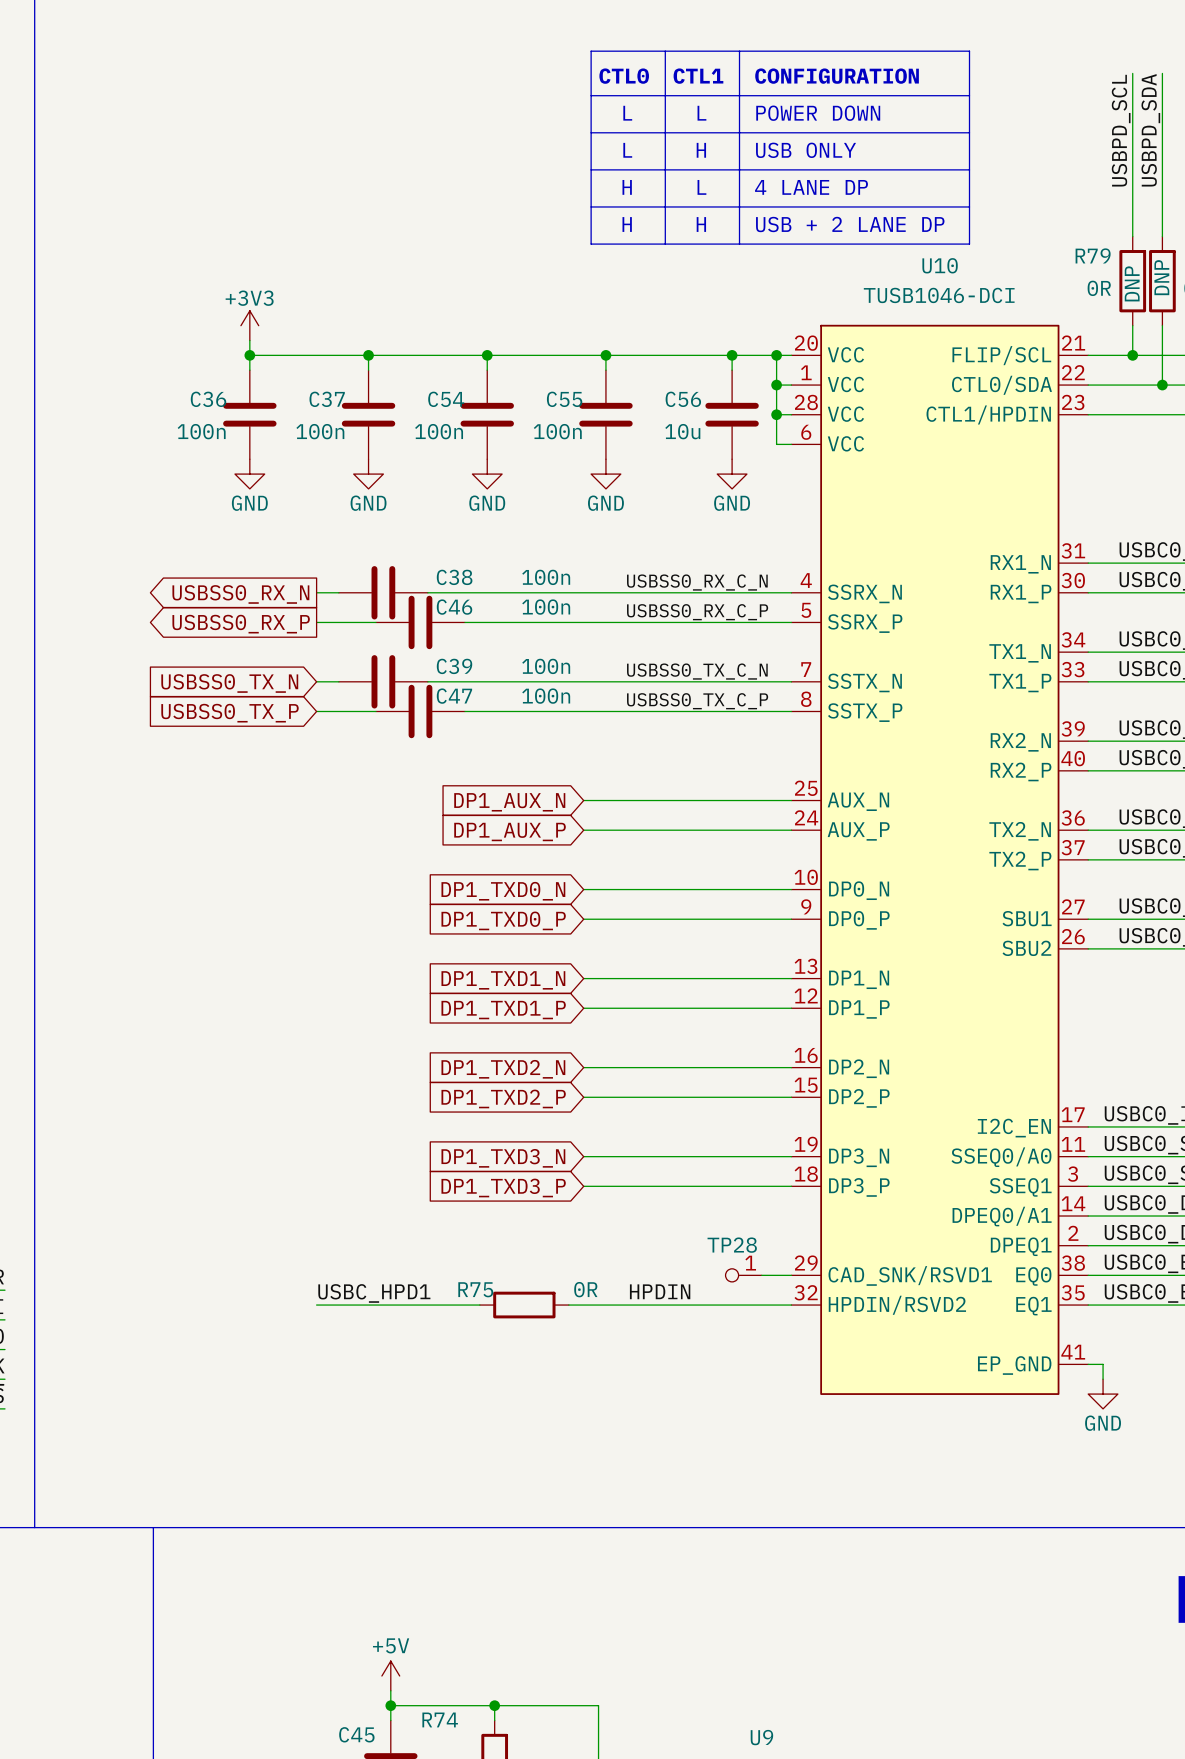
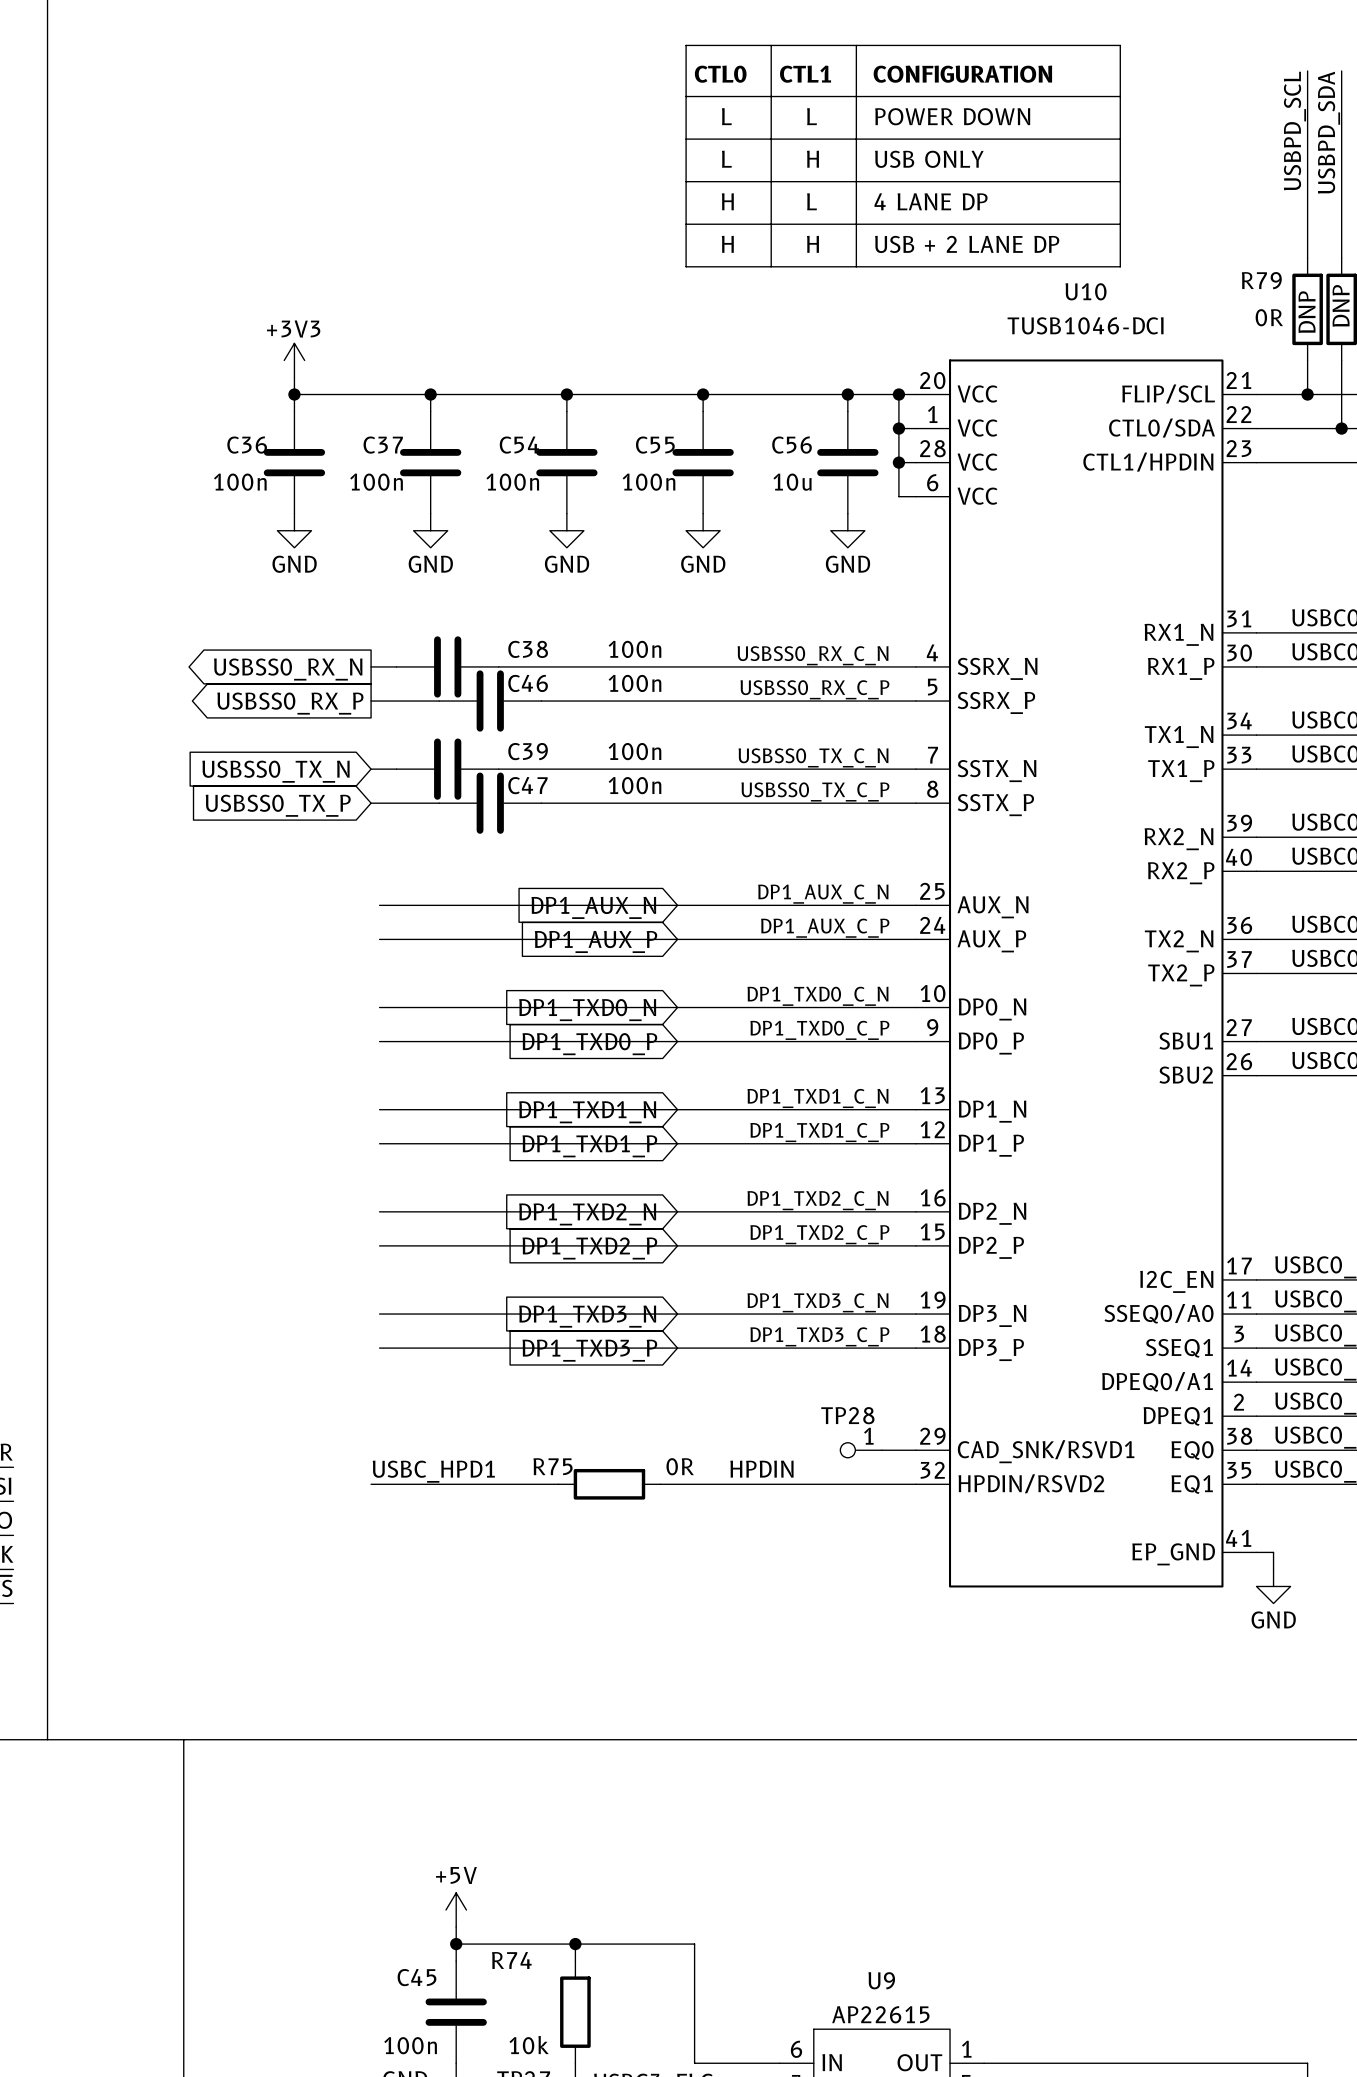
label: none -> DP1_AUX_C_N (823, 894)
wire: none -> (379, 905) (677, 905)
label: none -> DP1_AUX_C_P (825, 928)
wire: none -> (379, 939) (677, 939)
label: none -> DP1_TXD0_C_N (817, 996)
wire: none -> (379, 1007) (677, 1007)
label: none -> DP1_TXD0_C_P (819, 1030)
wire: none -> (379, 1041) (677, 1041)
label: none -> DP1_TXD1_C_N (817, 1098)
wire: none -> (379, 1109) (677, 1109)
label: none -> DP1_TXD1_C_P (819, 1132)
wire: none -> (379, 1143) (677, 1143)
label: none -> DP1_TXD2_C_N (817, 1200)
wire: none -> (379, 1211) (677, 1211)
label: none -> DP1_TXD2_C_P (819, 1234)
wire: none -> (379, 1245) (677, 1245)
label: none -> DP1_TXD3_C_N (817, 1302)
wire: none -> (379, 1314) (677, 1314)
label: none -> DP1_TXD3_C_P (819, 1336)
wire: none -> (379, 1348) (677, 1348)

